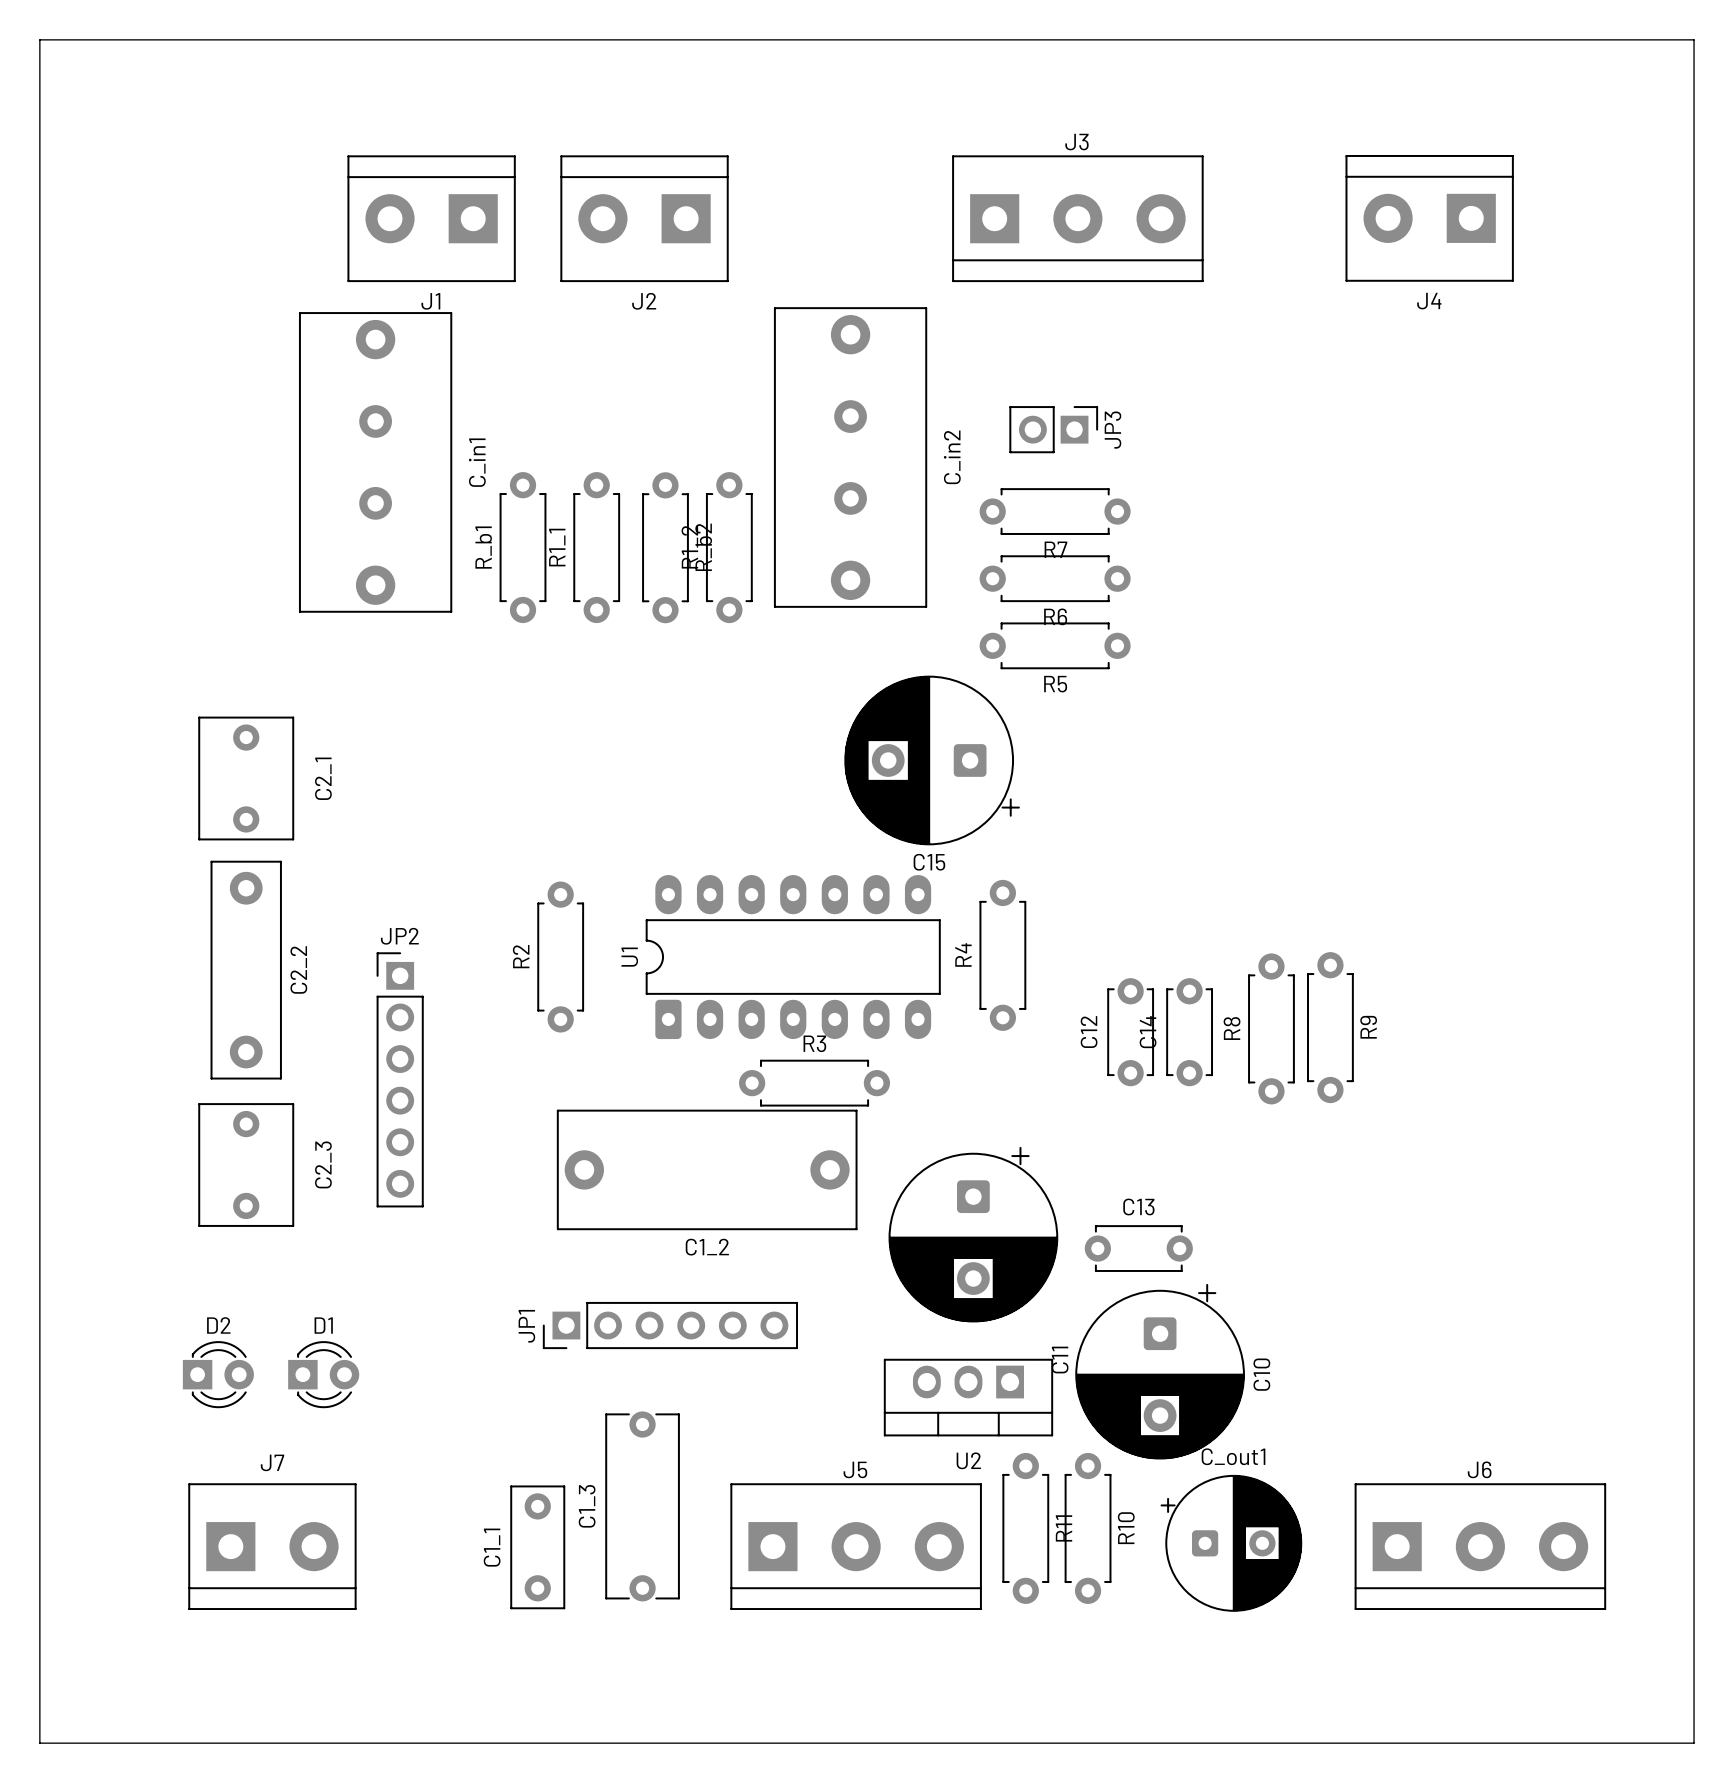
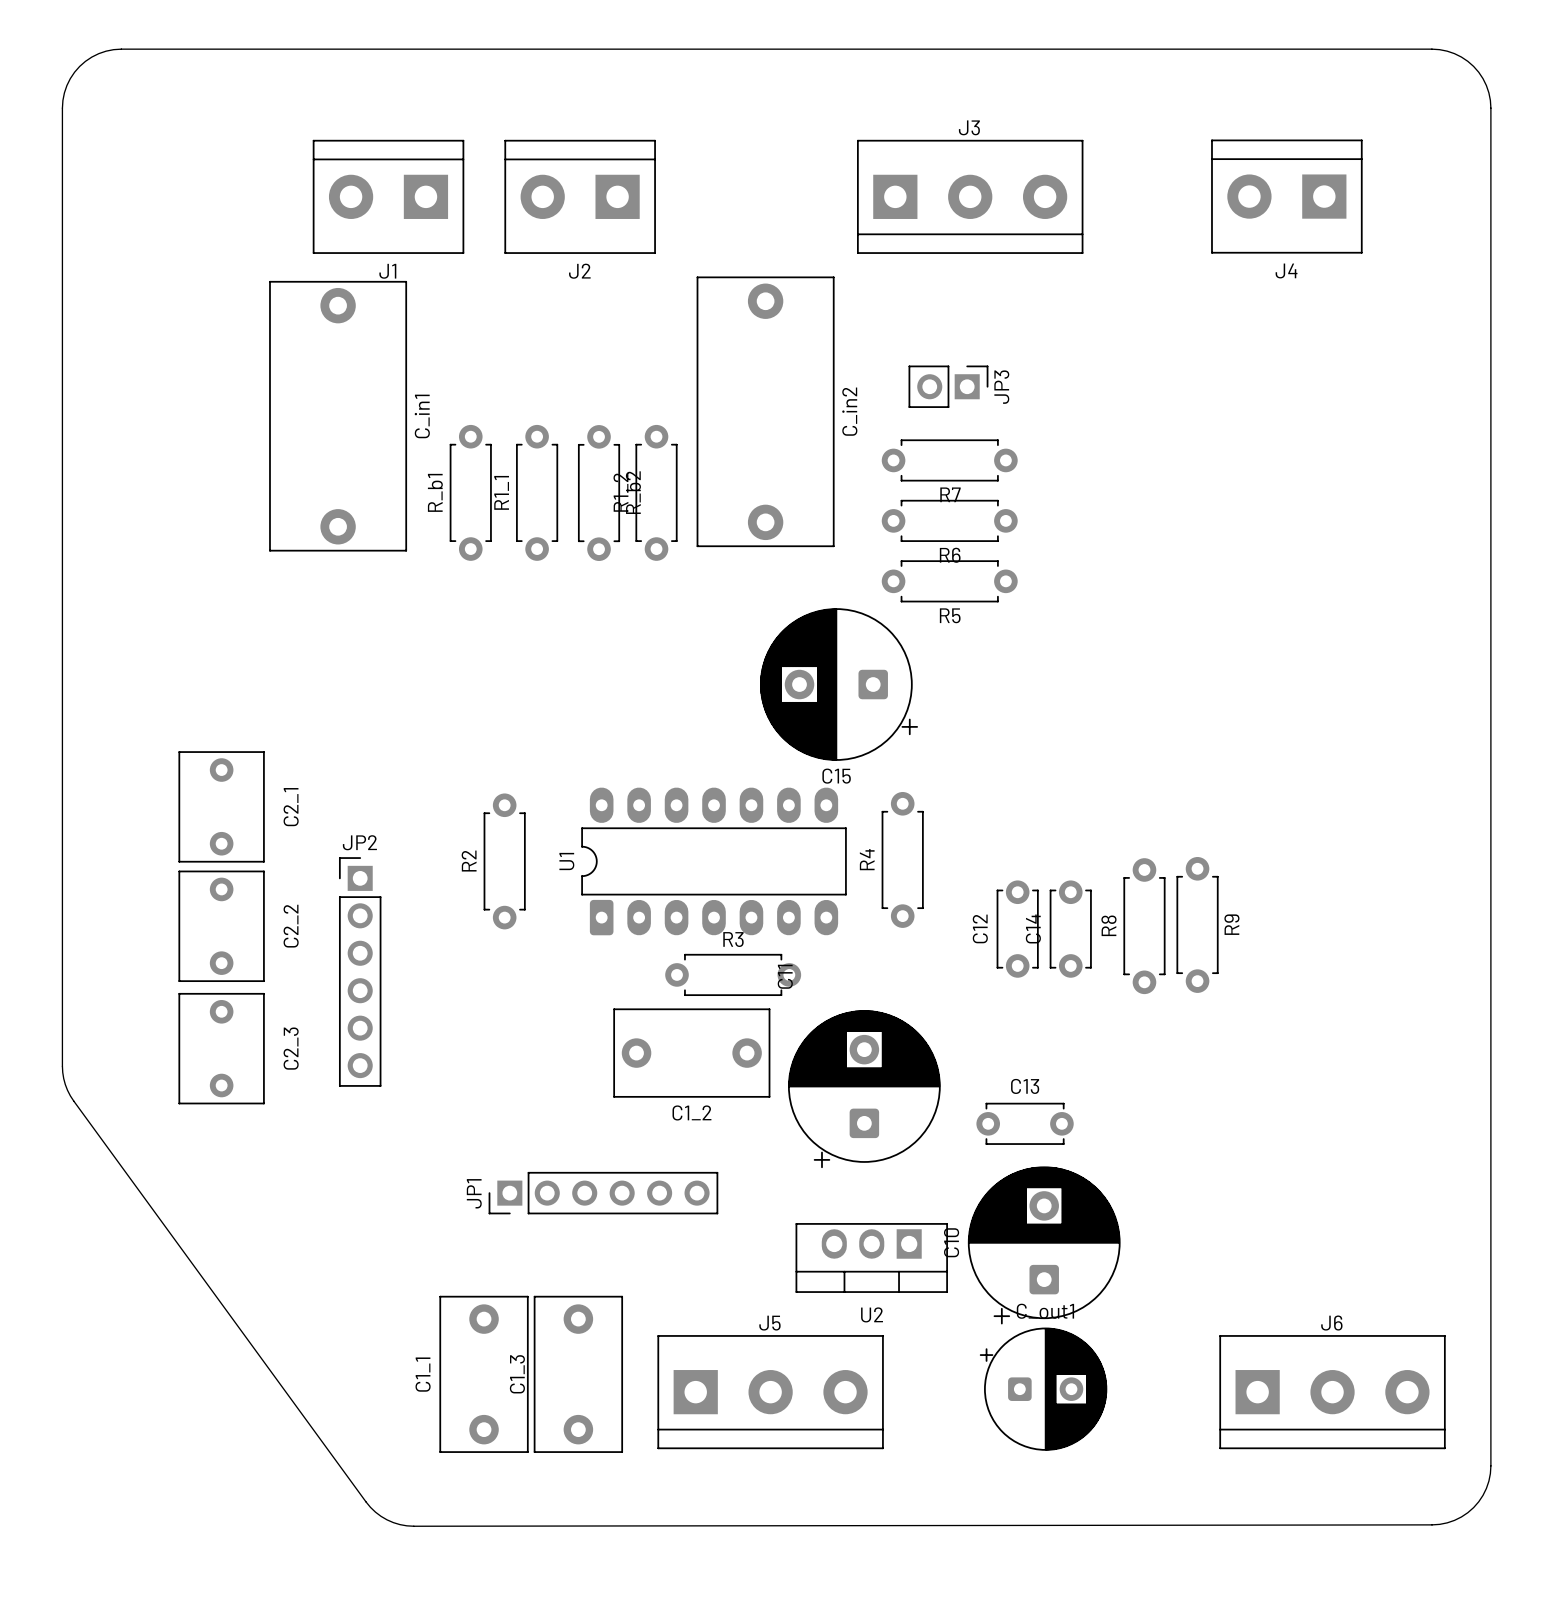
board edge: (39, 39) (1694, 39) (1694, 1743) (39, 1743) (39, 39) -> (121, 49) (98, 53) (79, 66) (66, 85) (62, 108) (63, 1078) (73, 1101) (370, 1507) (381, 1516) (393, 1522) (413, 1526) (1432, 1524) (1454, 1520) (1473, 1507) (1486, 1488) (1490, 1465) (1490, 108) (1486, 85) (1473, 66) (1454, 53) (1431, 49) (121, 49)
C_in2 footprint: [773, 307, 928, 608] -> [696, 276, 835, 548]
C_in1 footprint: [298, 312, 453, 613] -> [269, 280, 408, 552]
C2_1 position: (246, 778) -> (221, 806)
C2_2 footprint: [210, 860, 282, 1080] -> [178, 870, 265, 983]
C1_2 footprint: [556, 1109, 858, 1231] -> [613, 1008, 771, 1098]
C11 rotation: 0° (973, 1234) -> 180° (864, 1089)
C10 rotation: 0° (1160, 1371) -> 180° (1044, 1245)
D2: (218, 1374) -> none
D1: (323, 1374) -> none
C1_3 footprint: [605, 1411, 680, 1602] -> [533, 1295, 624, 1453]
C1_1 footprint: [510, 1485, 566, 1610] -> [439, 1295, 529, 1453]
R11: (1025, 1528) -> none
R10: (1088, 1528) -> none
C_out1 position: (1231, 1543) -> (1043, 1389)
J7: (272, 1546) -> none

